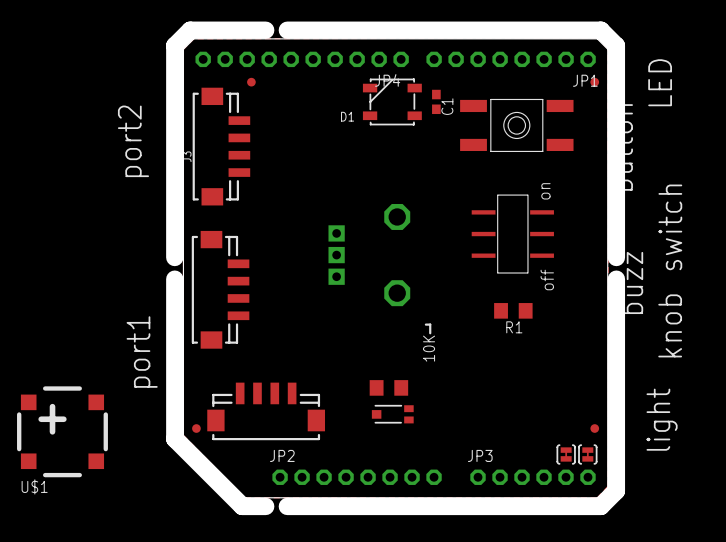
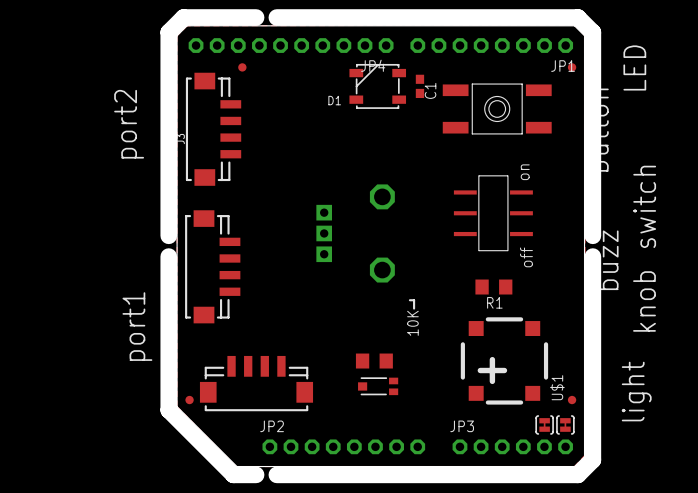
U$1 rotation: 0° (62, 431) -> 90° counterclockwise (504, 360)
U$1 position: (62, 431) -> (504, 360)

